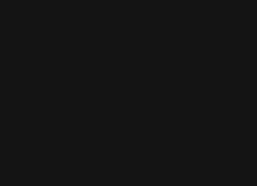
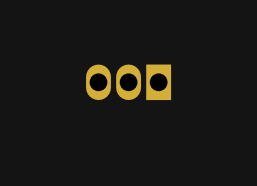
part: none -> (128, 82)

